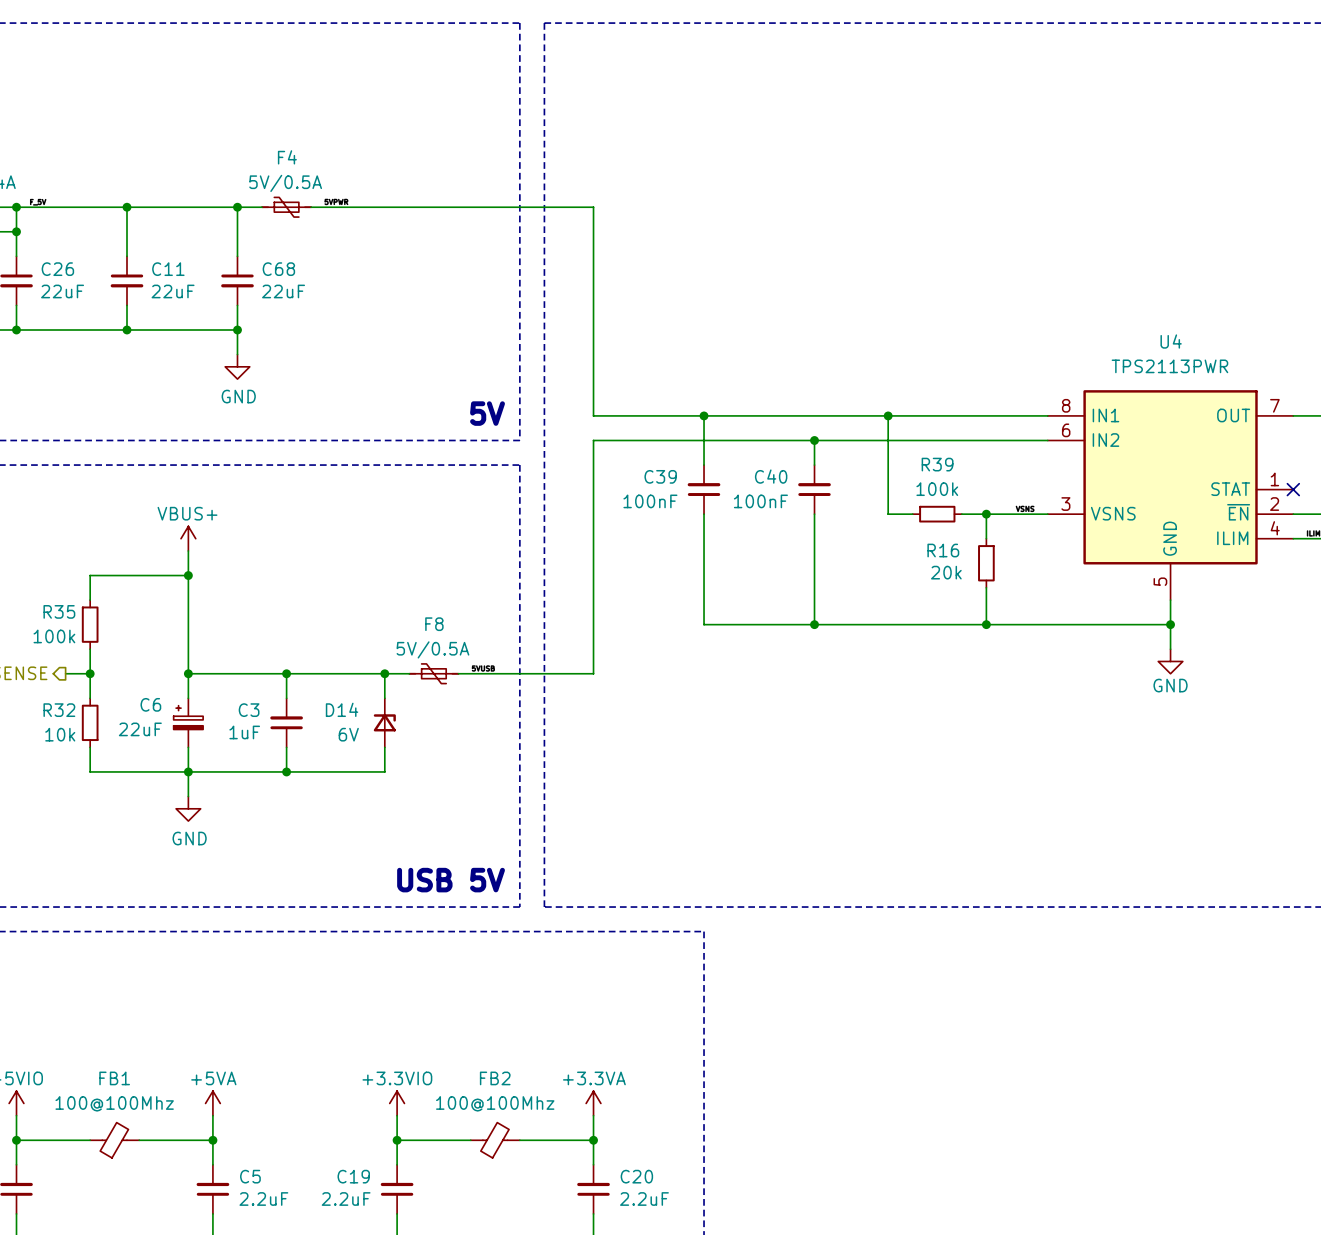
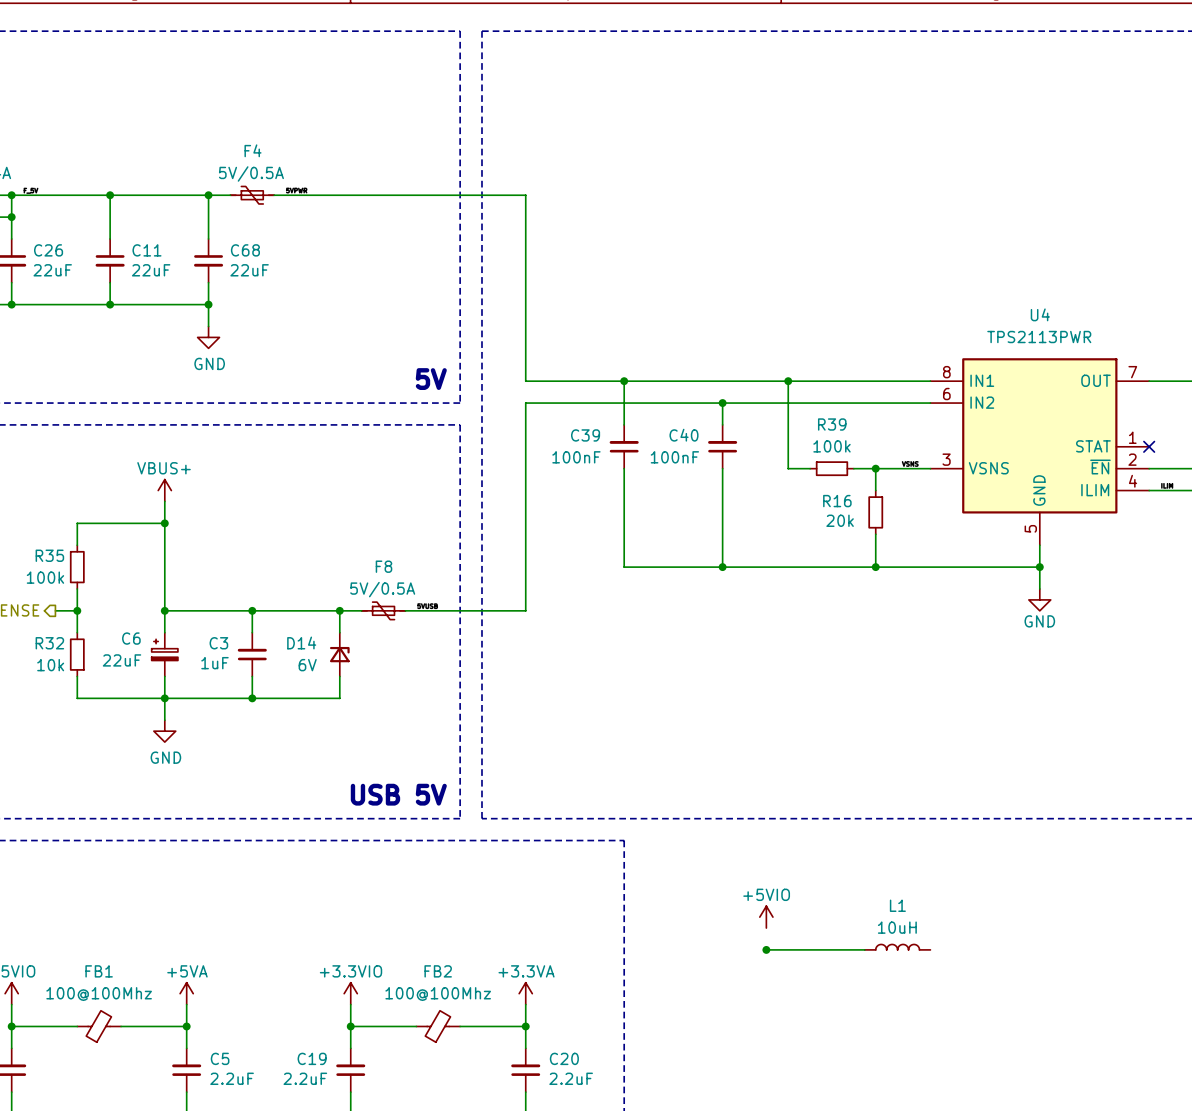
power symbol: none -> +5VIO (766, 917)
L1: none -> 10uH (897, 947)
wire: none -> (766, 949) (864, 949)
junction: none -> (766, 949)

